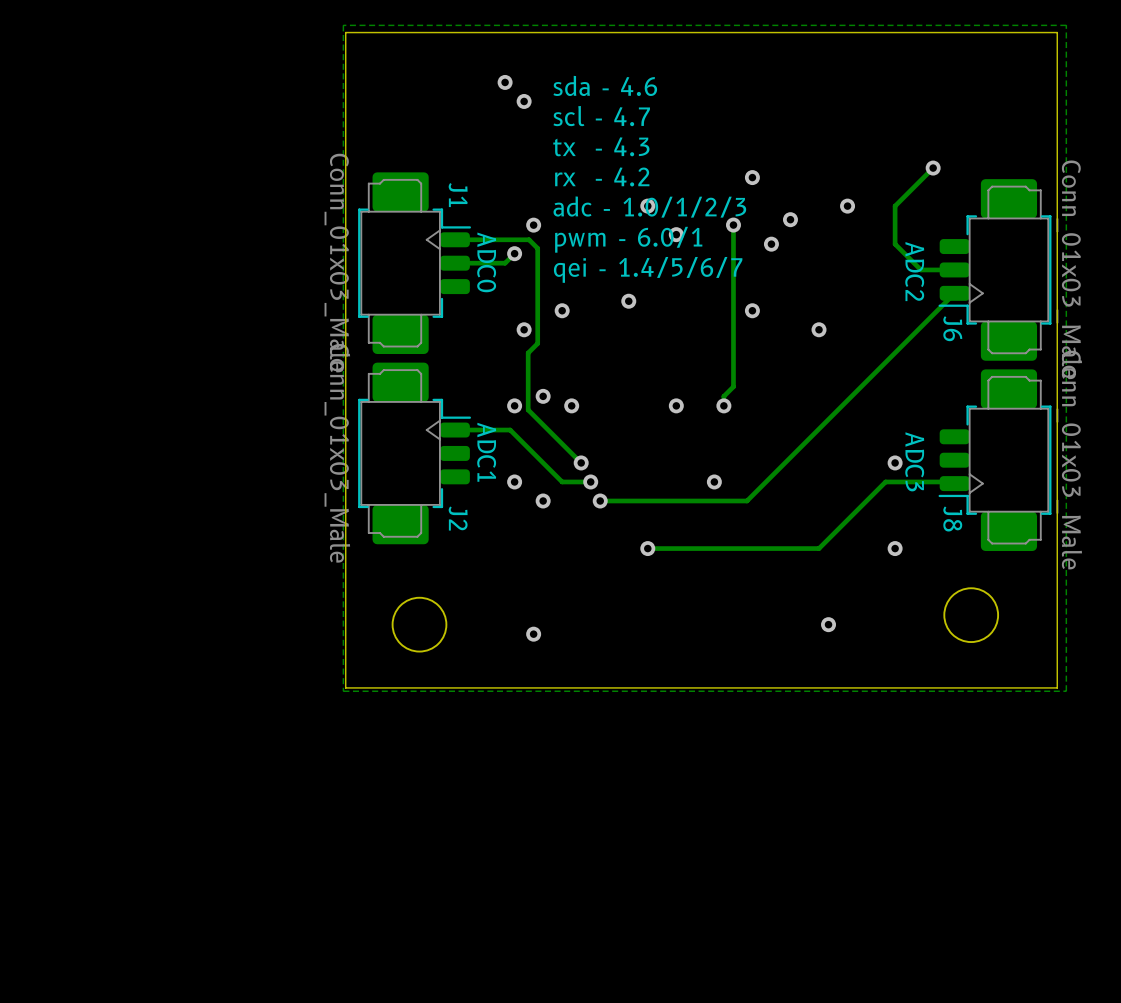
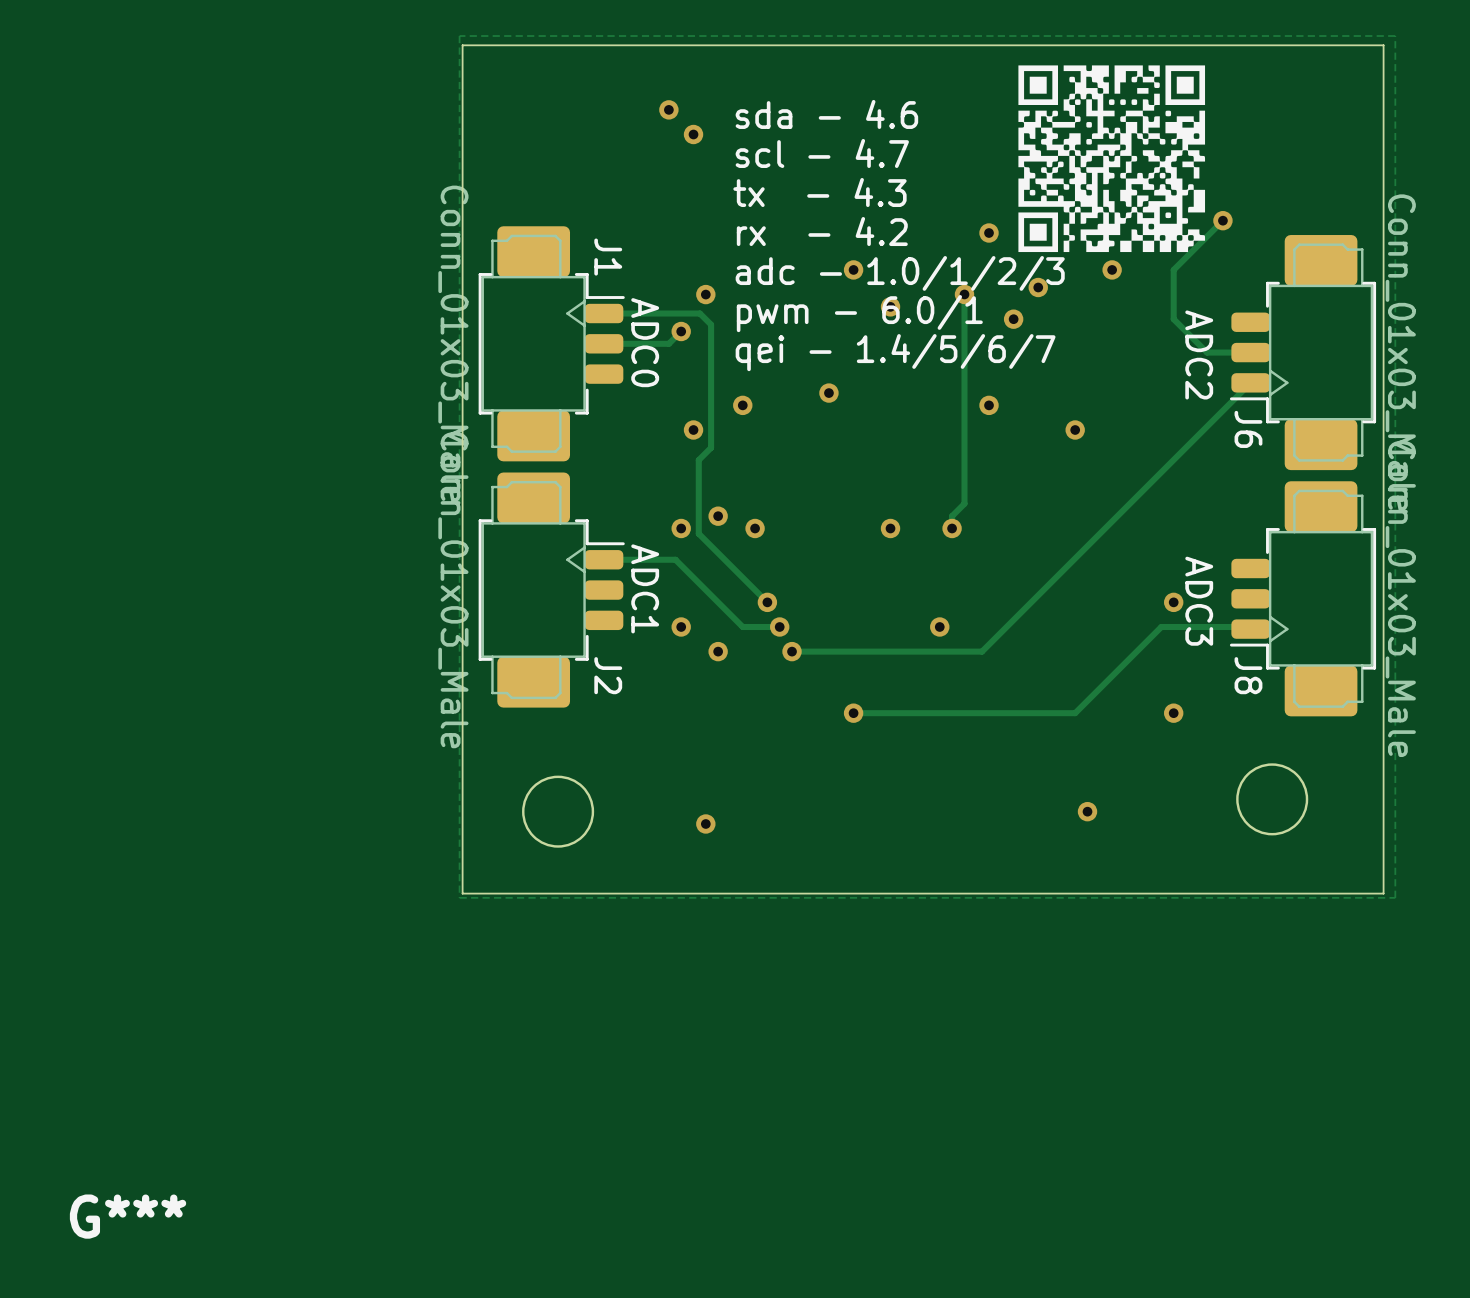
G***: none -> (1111, 158)

